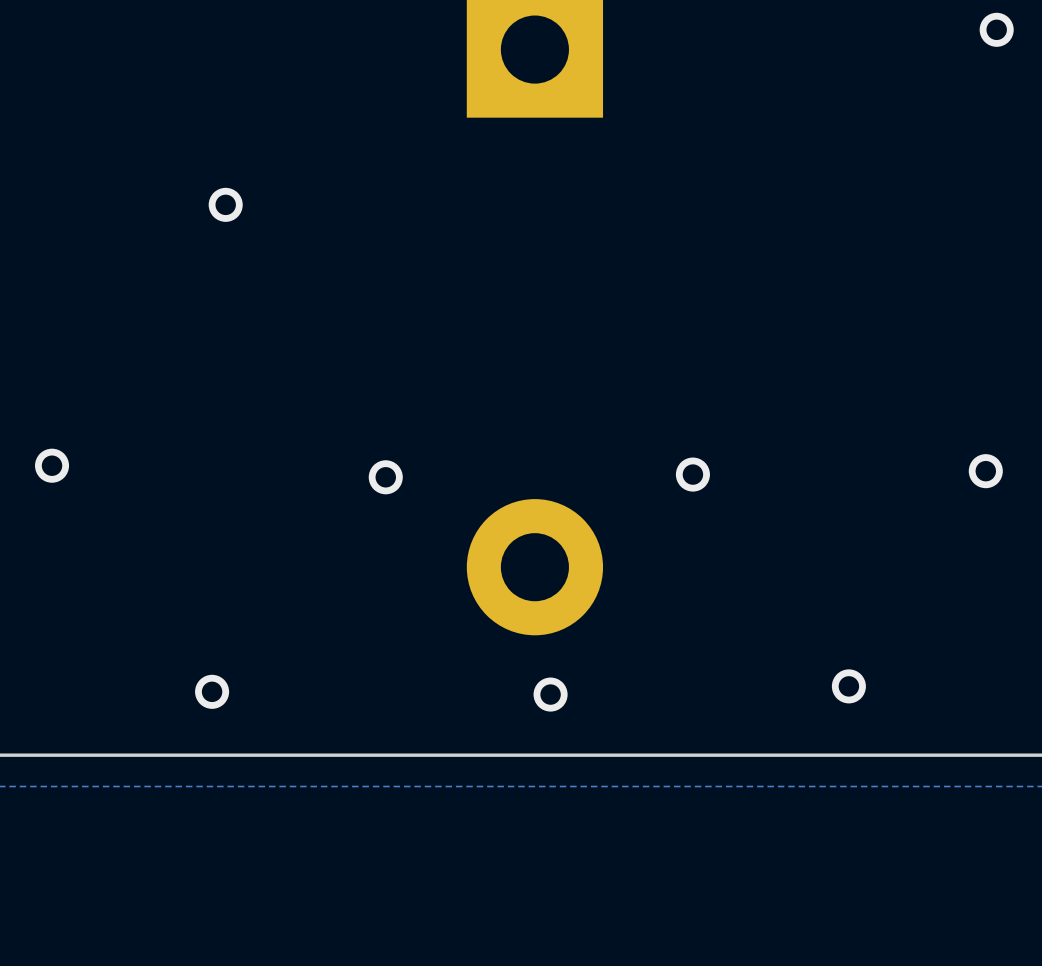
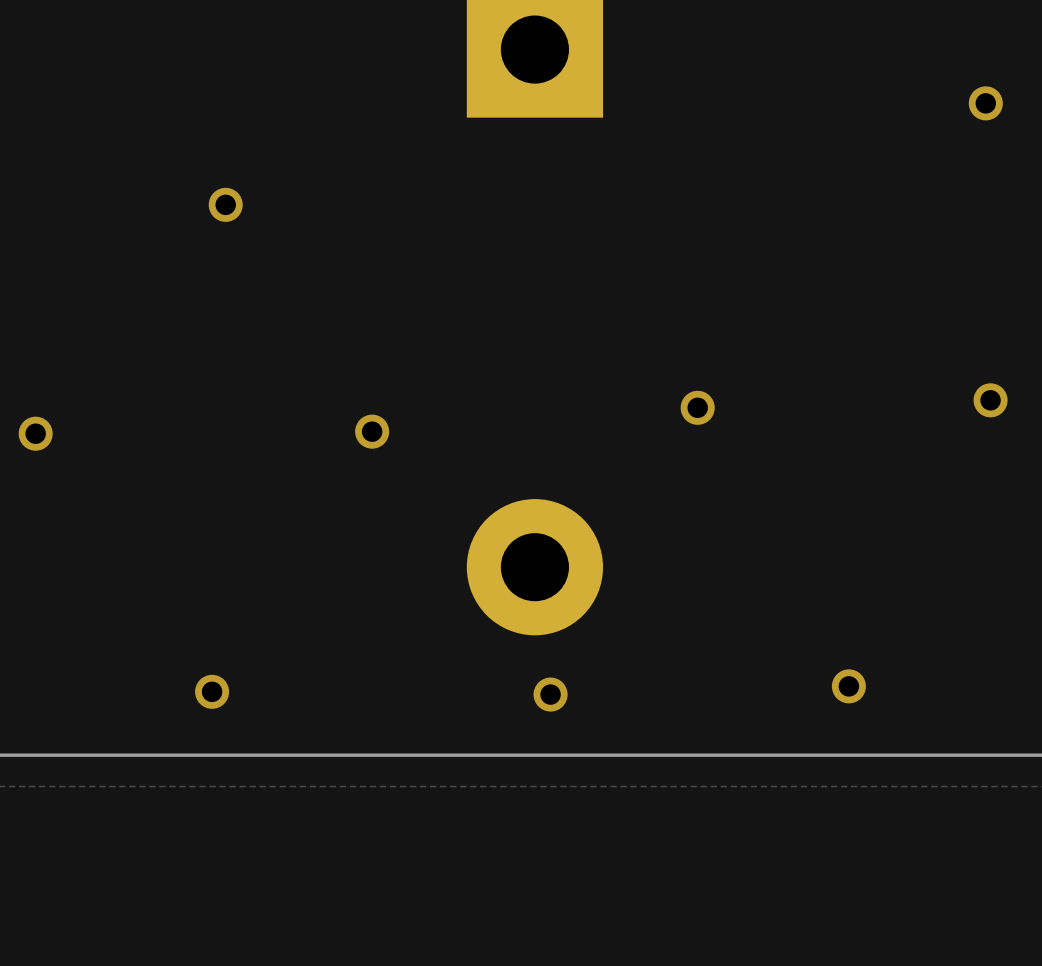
via position: (996, 29) -> (985, 103)
via position: (52, 465) -> (35, 433)
via position: (985, 471) -> (990, 400)
via position: (692, 474) -> (697, 407)
via position: (385, 477) -> (372, 431)

